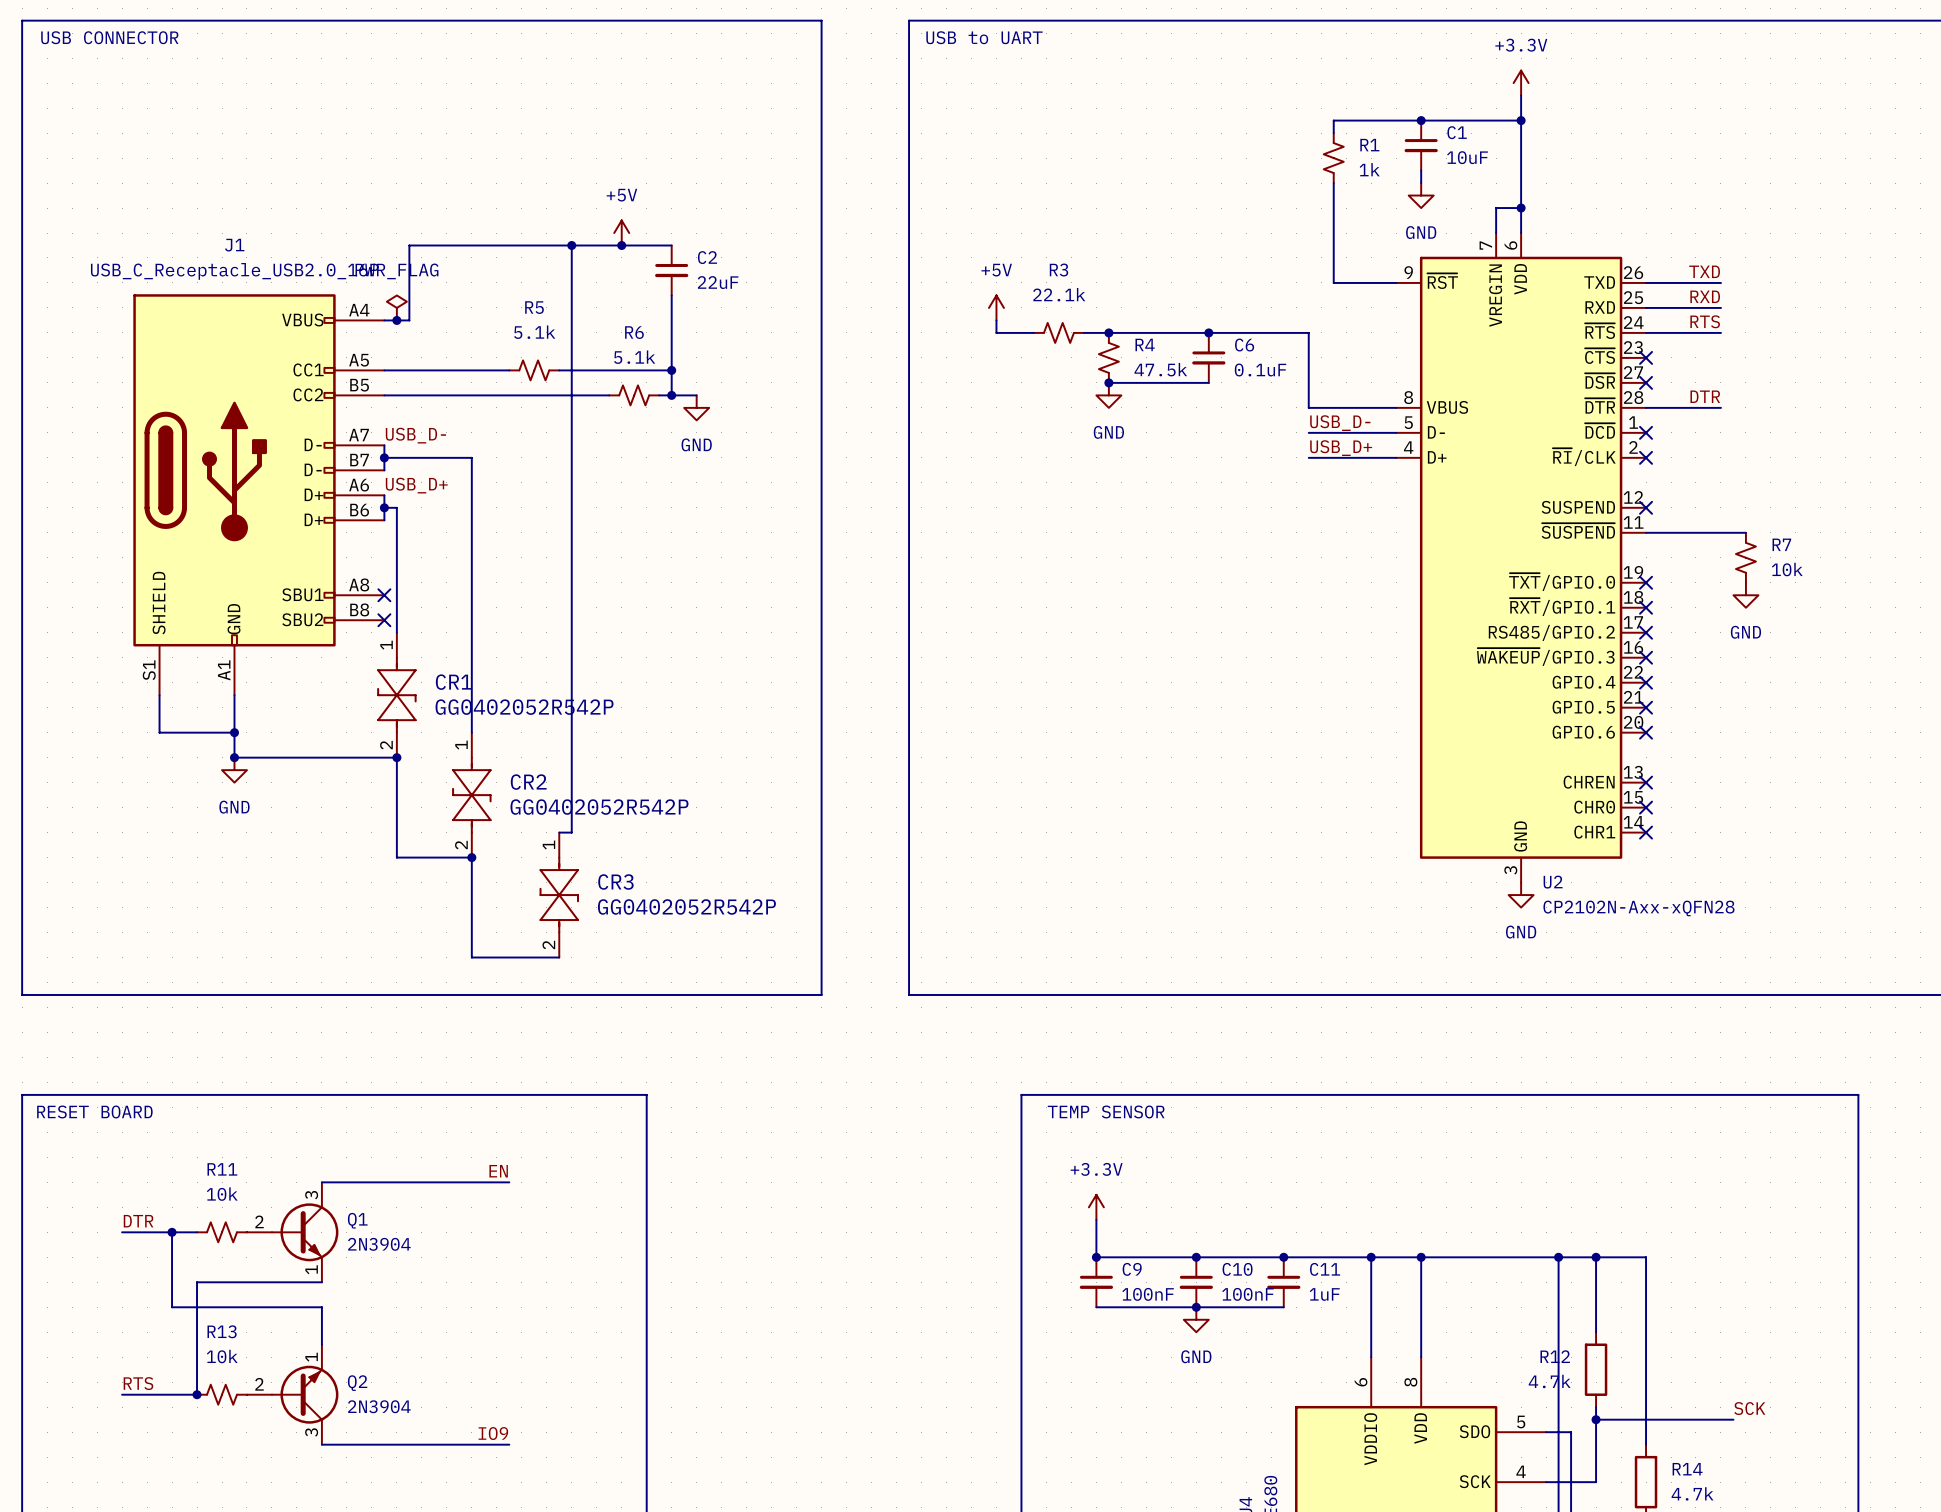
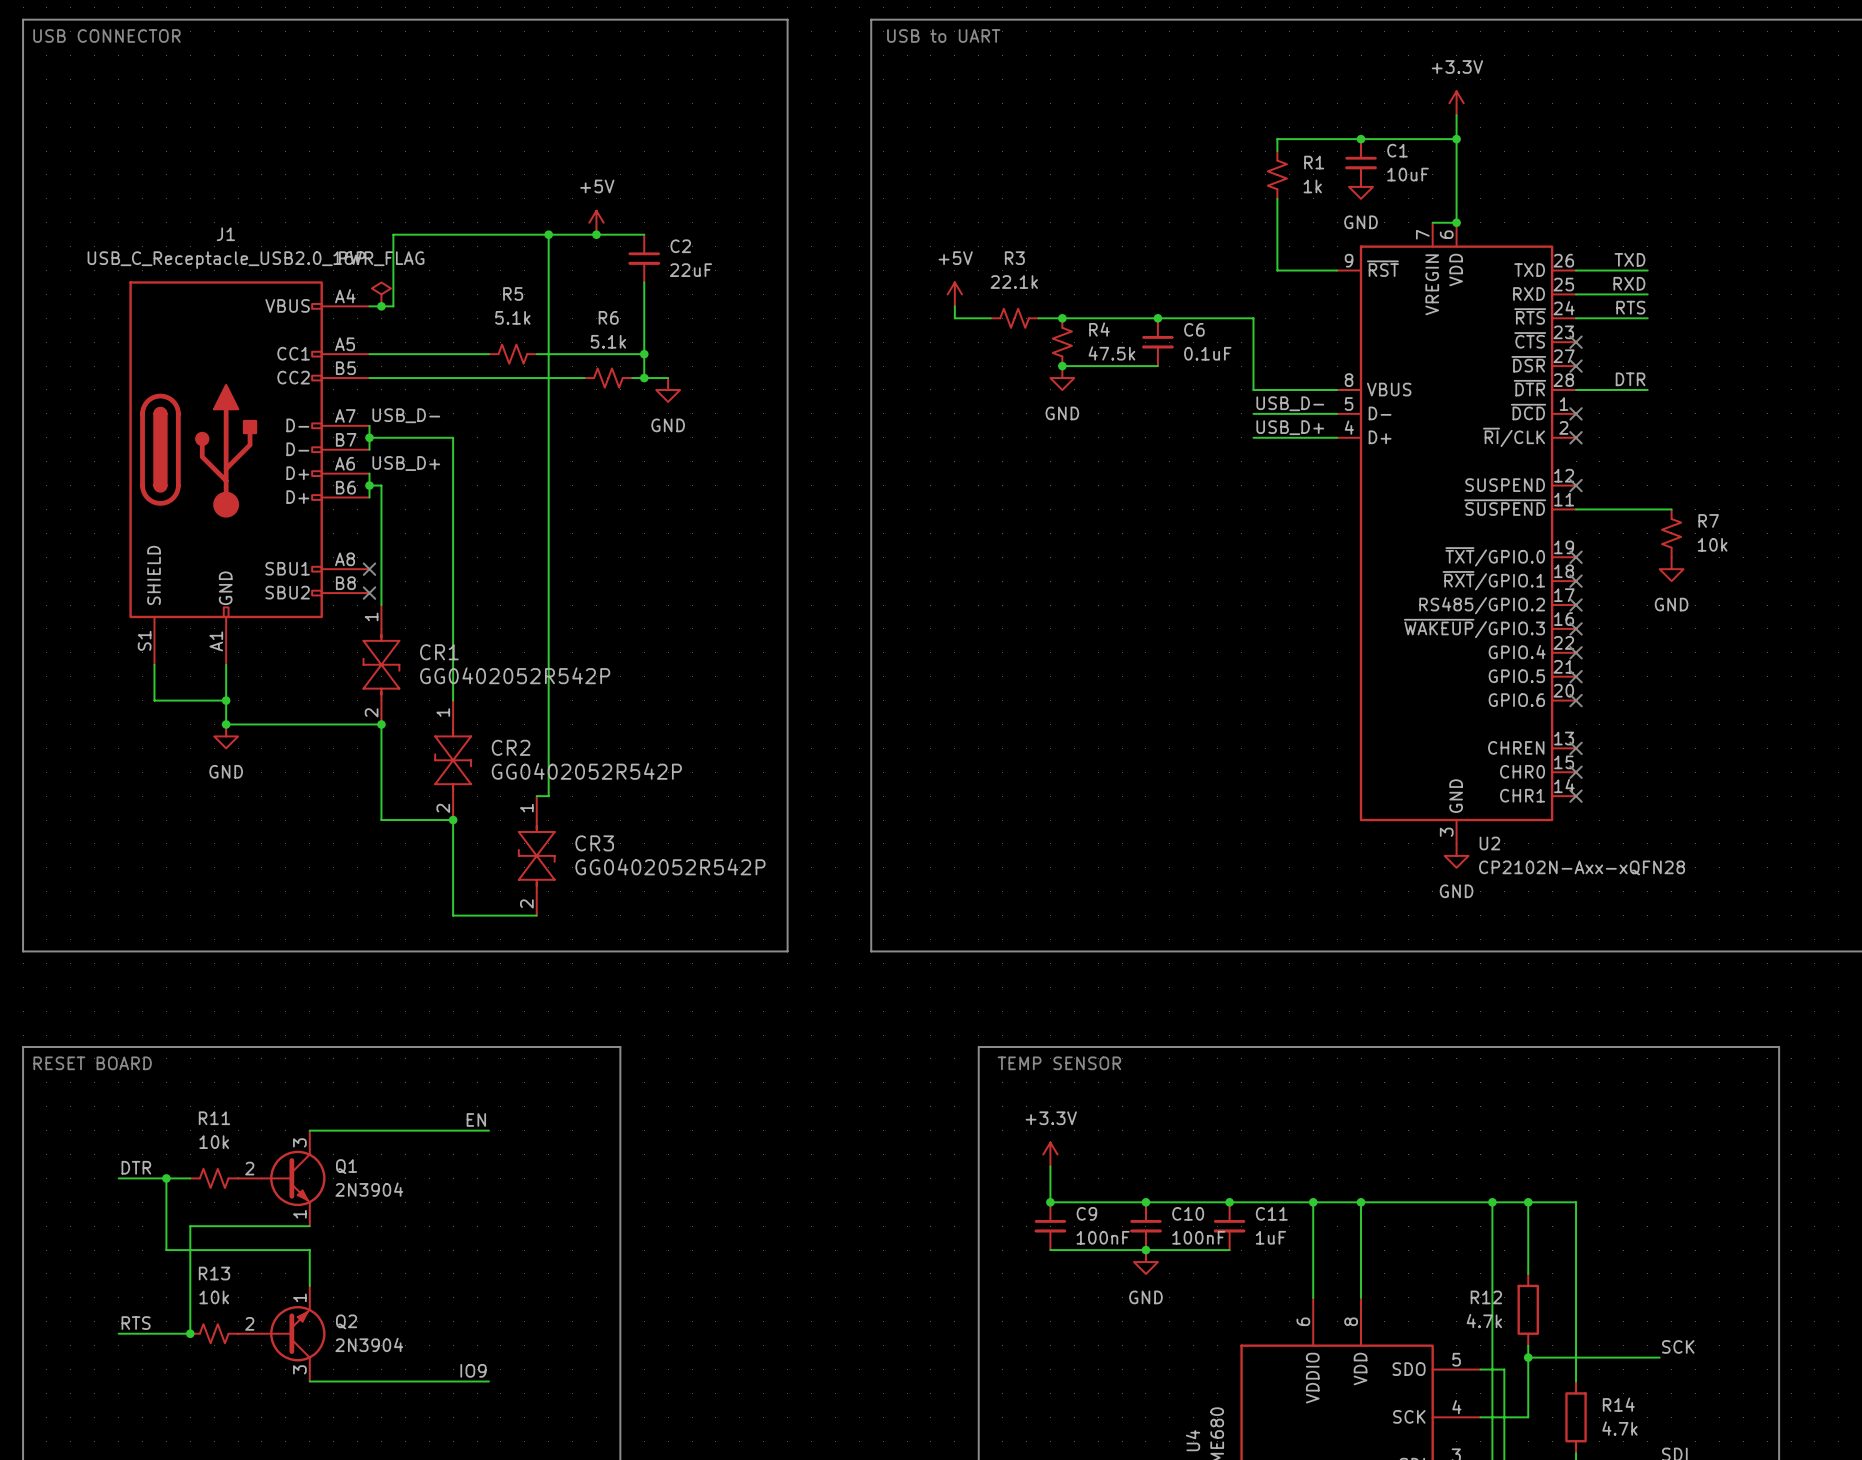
power symbol position: +3.3V (1521, 83) -> +3.3V (1456, 103)
wire: (1521, 95) (1521, 120) (1333, 120) (1333, 133) -> none
junction position: (1421, 120) -> (1361, 139)
junction position: (1521, 120) -> (1456, 139)
C1 position: (1421, 145) -> (1361, 163)
wire: none -> (1456, 139) (1277, 139) (1277, 151)
R1 position: (1333, 158) -> (1277, 174)
wire: (1521, 208) (1496, 208) (1496, 233) -> (1456, 222) (1432, 222)
junction position: (1521, 208) -> (1456, 222)

